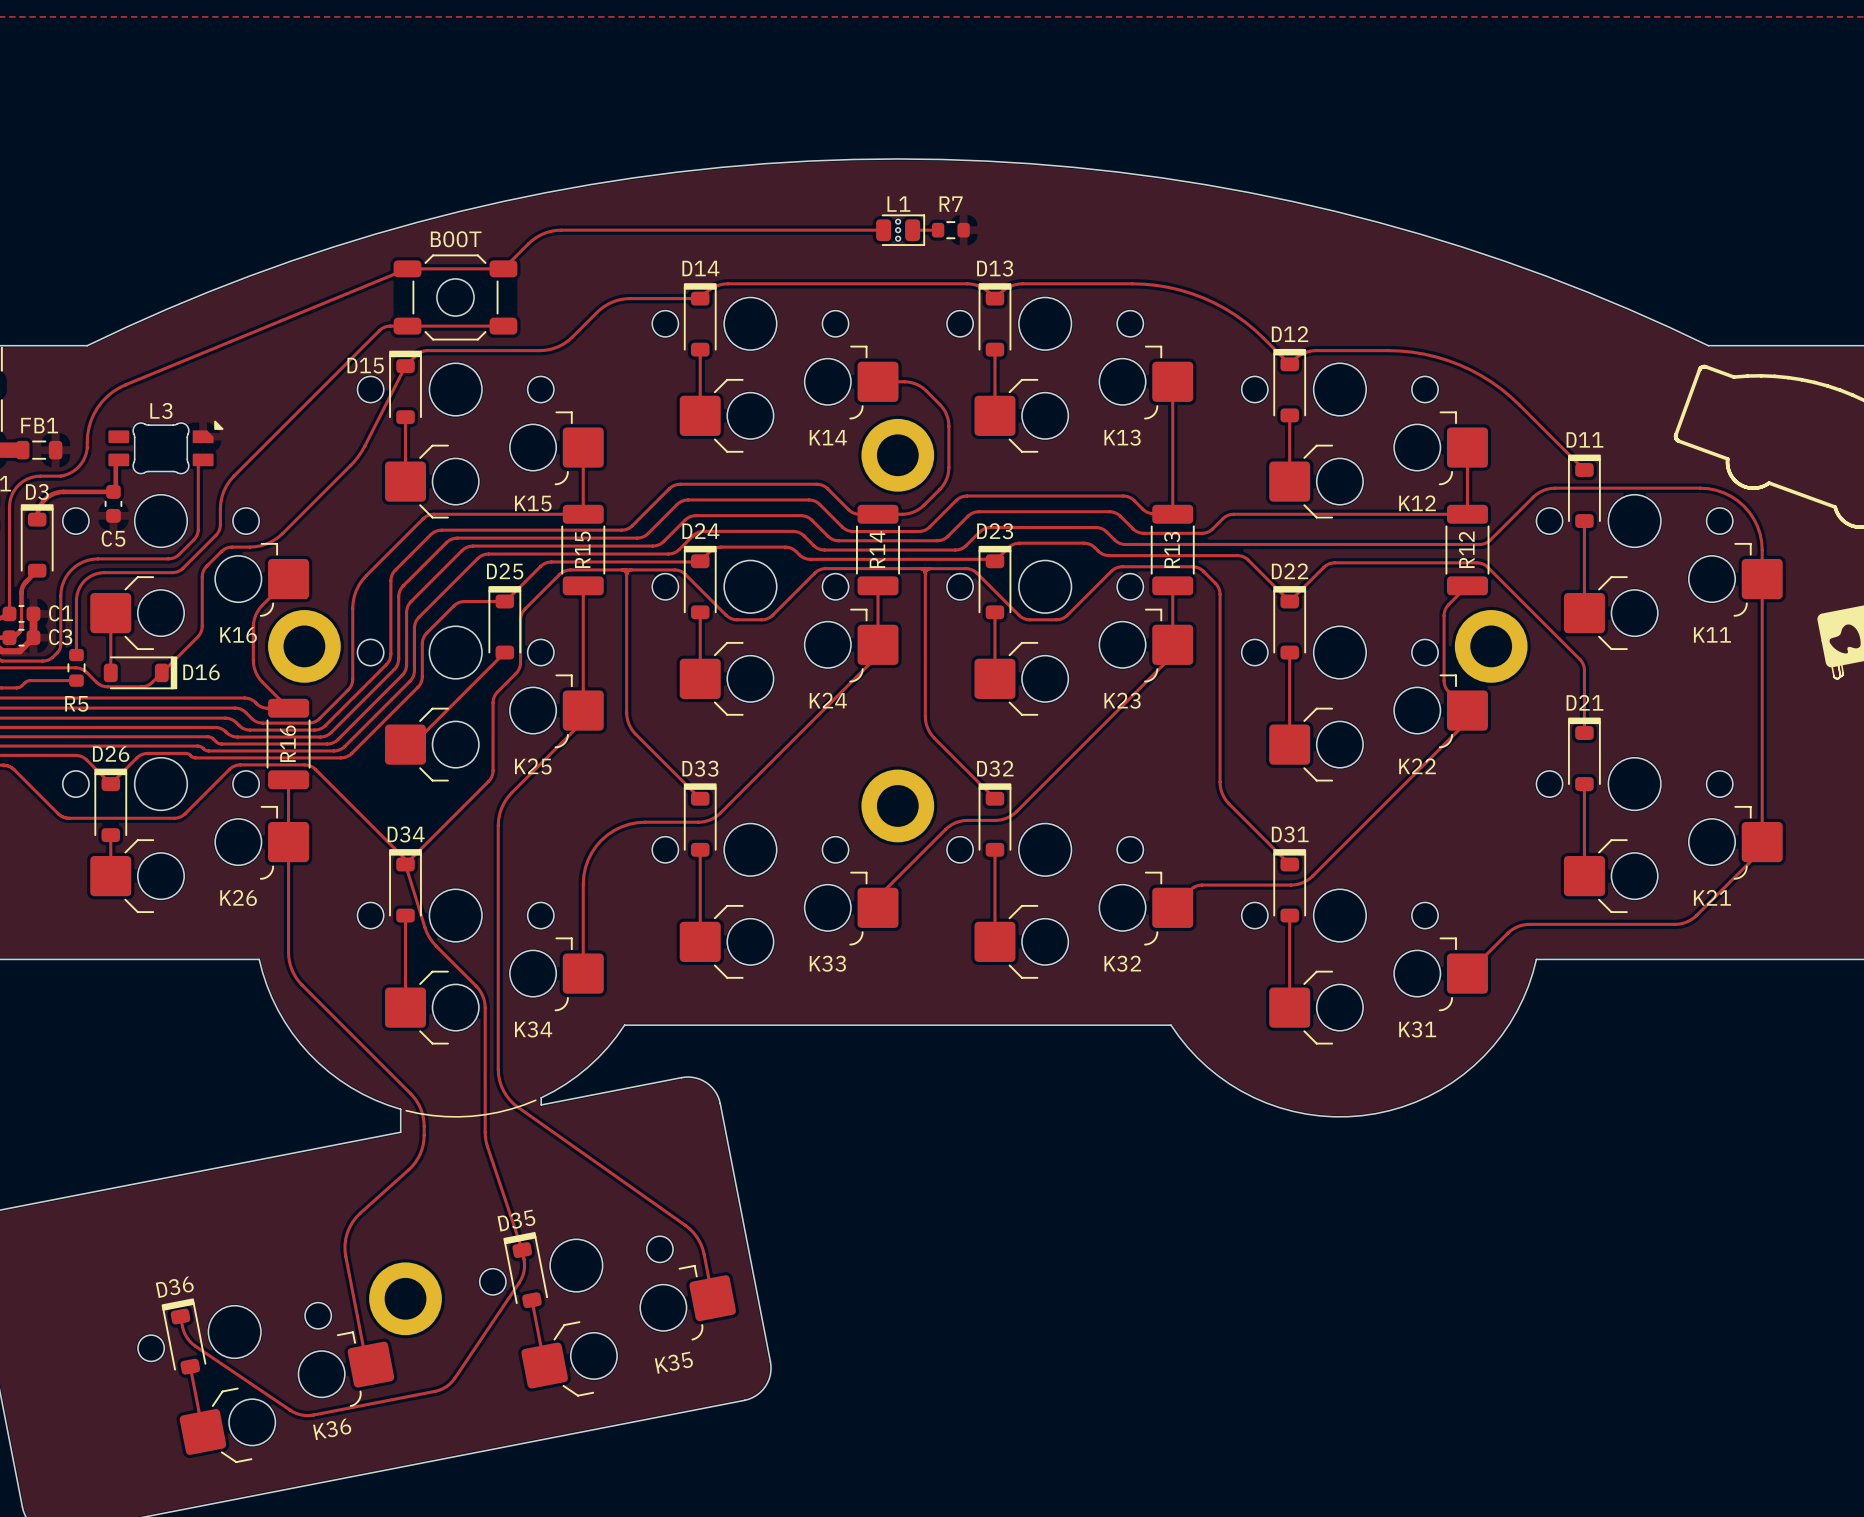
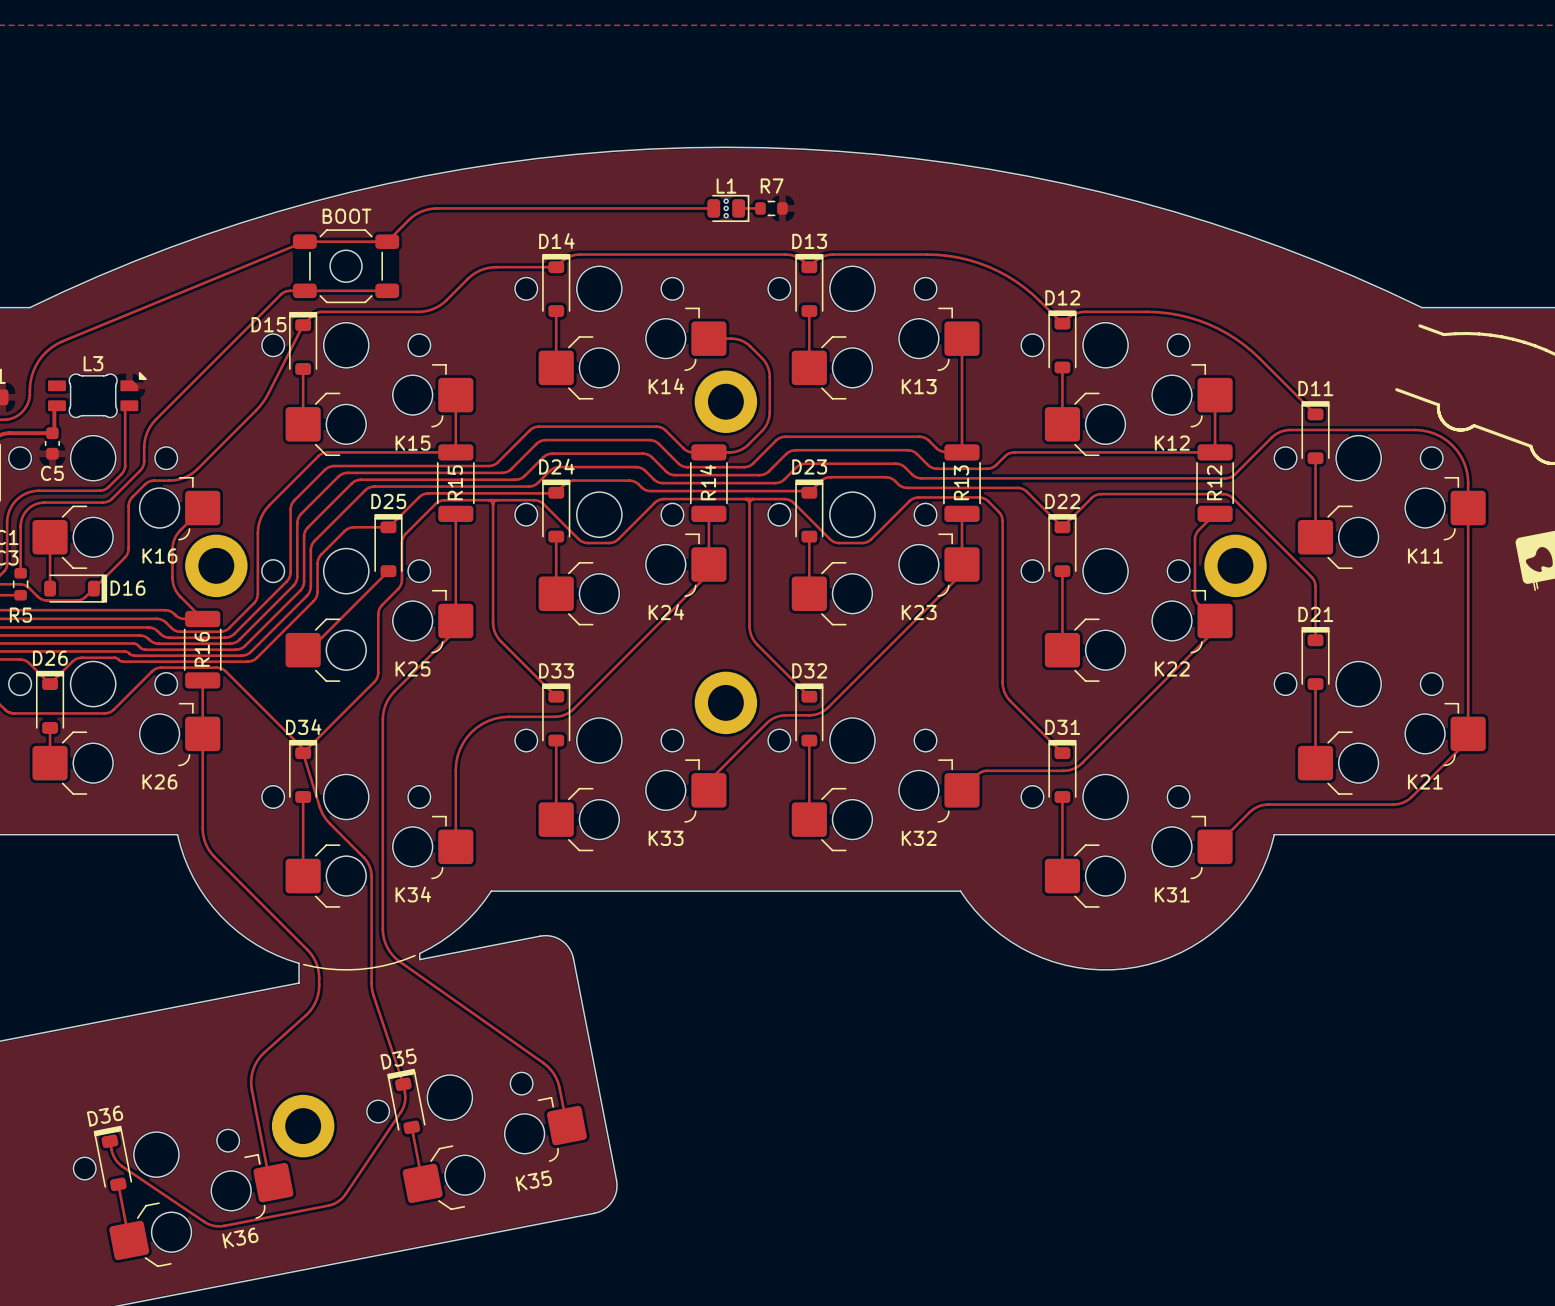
line: (1699, 369) (1675, 434) -> none
line: (1831, 665) (1833, 676) -> none

